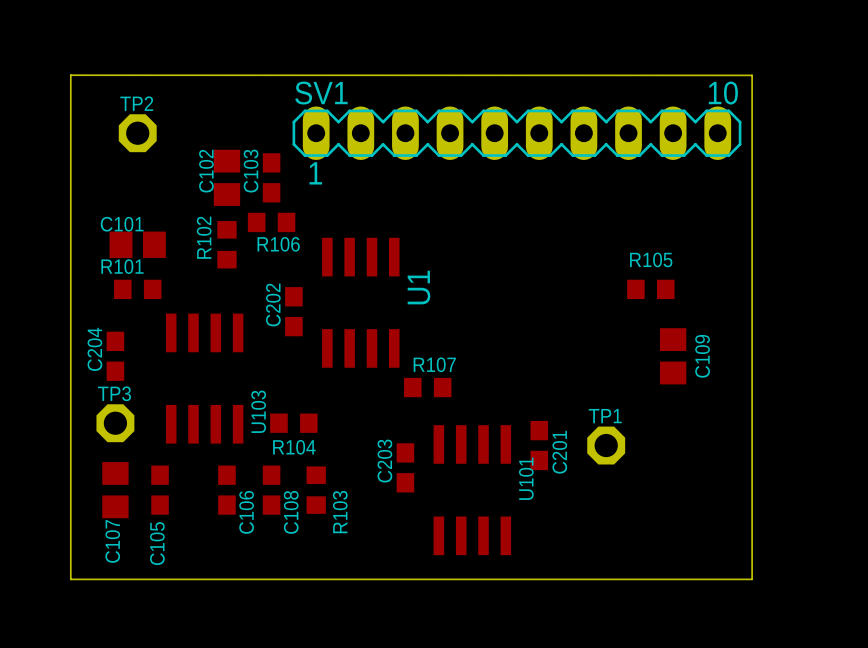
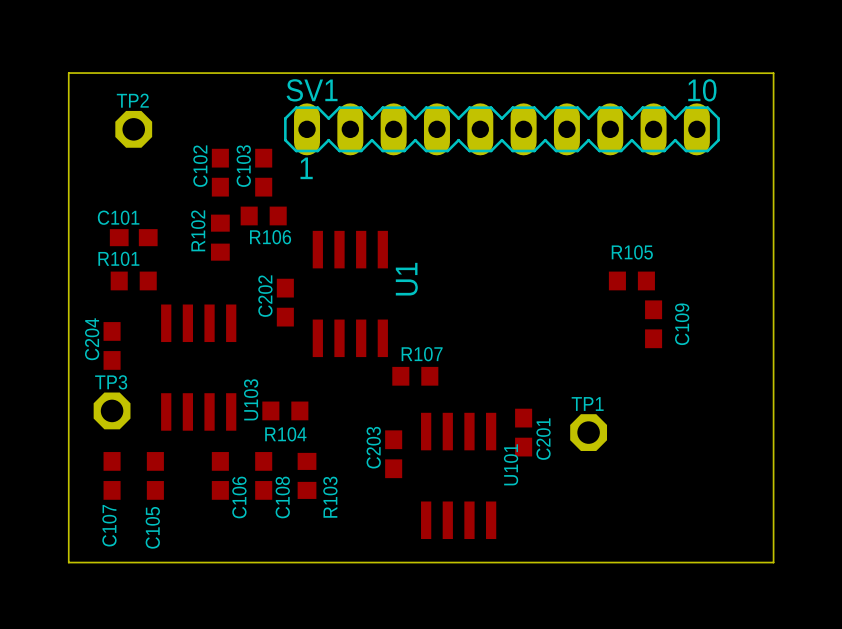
board edge: (752, 75) (752, 579) -> (730, 73) (773, 73) (773, 562) (730, 562)
C102 footprint: [213, 149, 241, 206] -> [211, 148, 229, 197]
C101 footprint: [109, 231, 166, 258] -> [109, 229, 158, 247]
C109 footprint: [659, 328, 687, 385] -> [645, 300, 663, 349]
C107 footprint: [102, 462, 129, 519] -> [103, 452, 121, 500]

